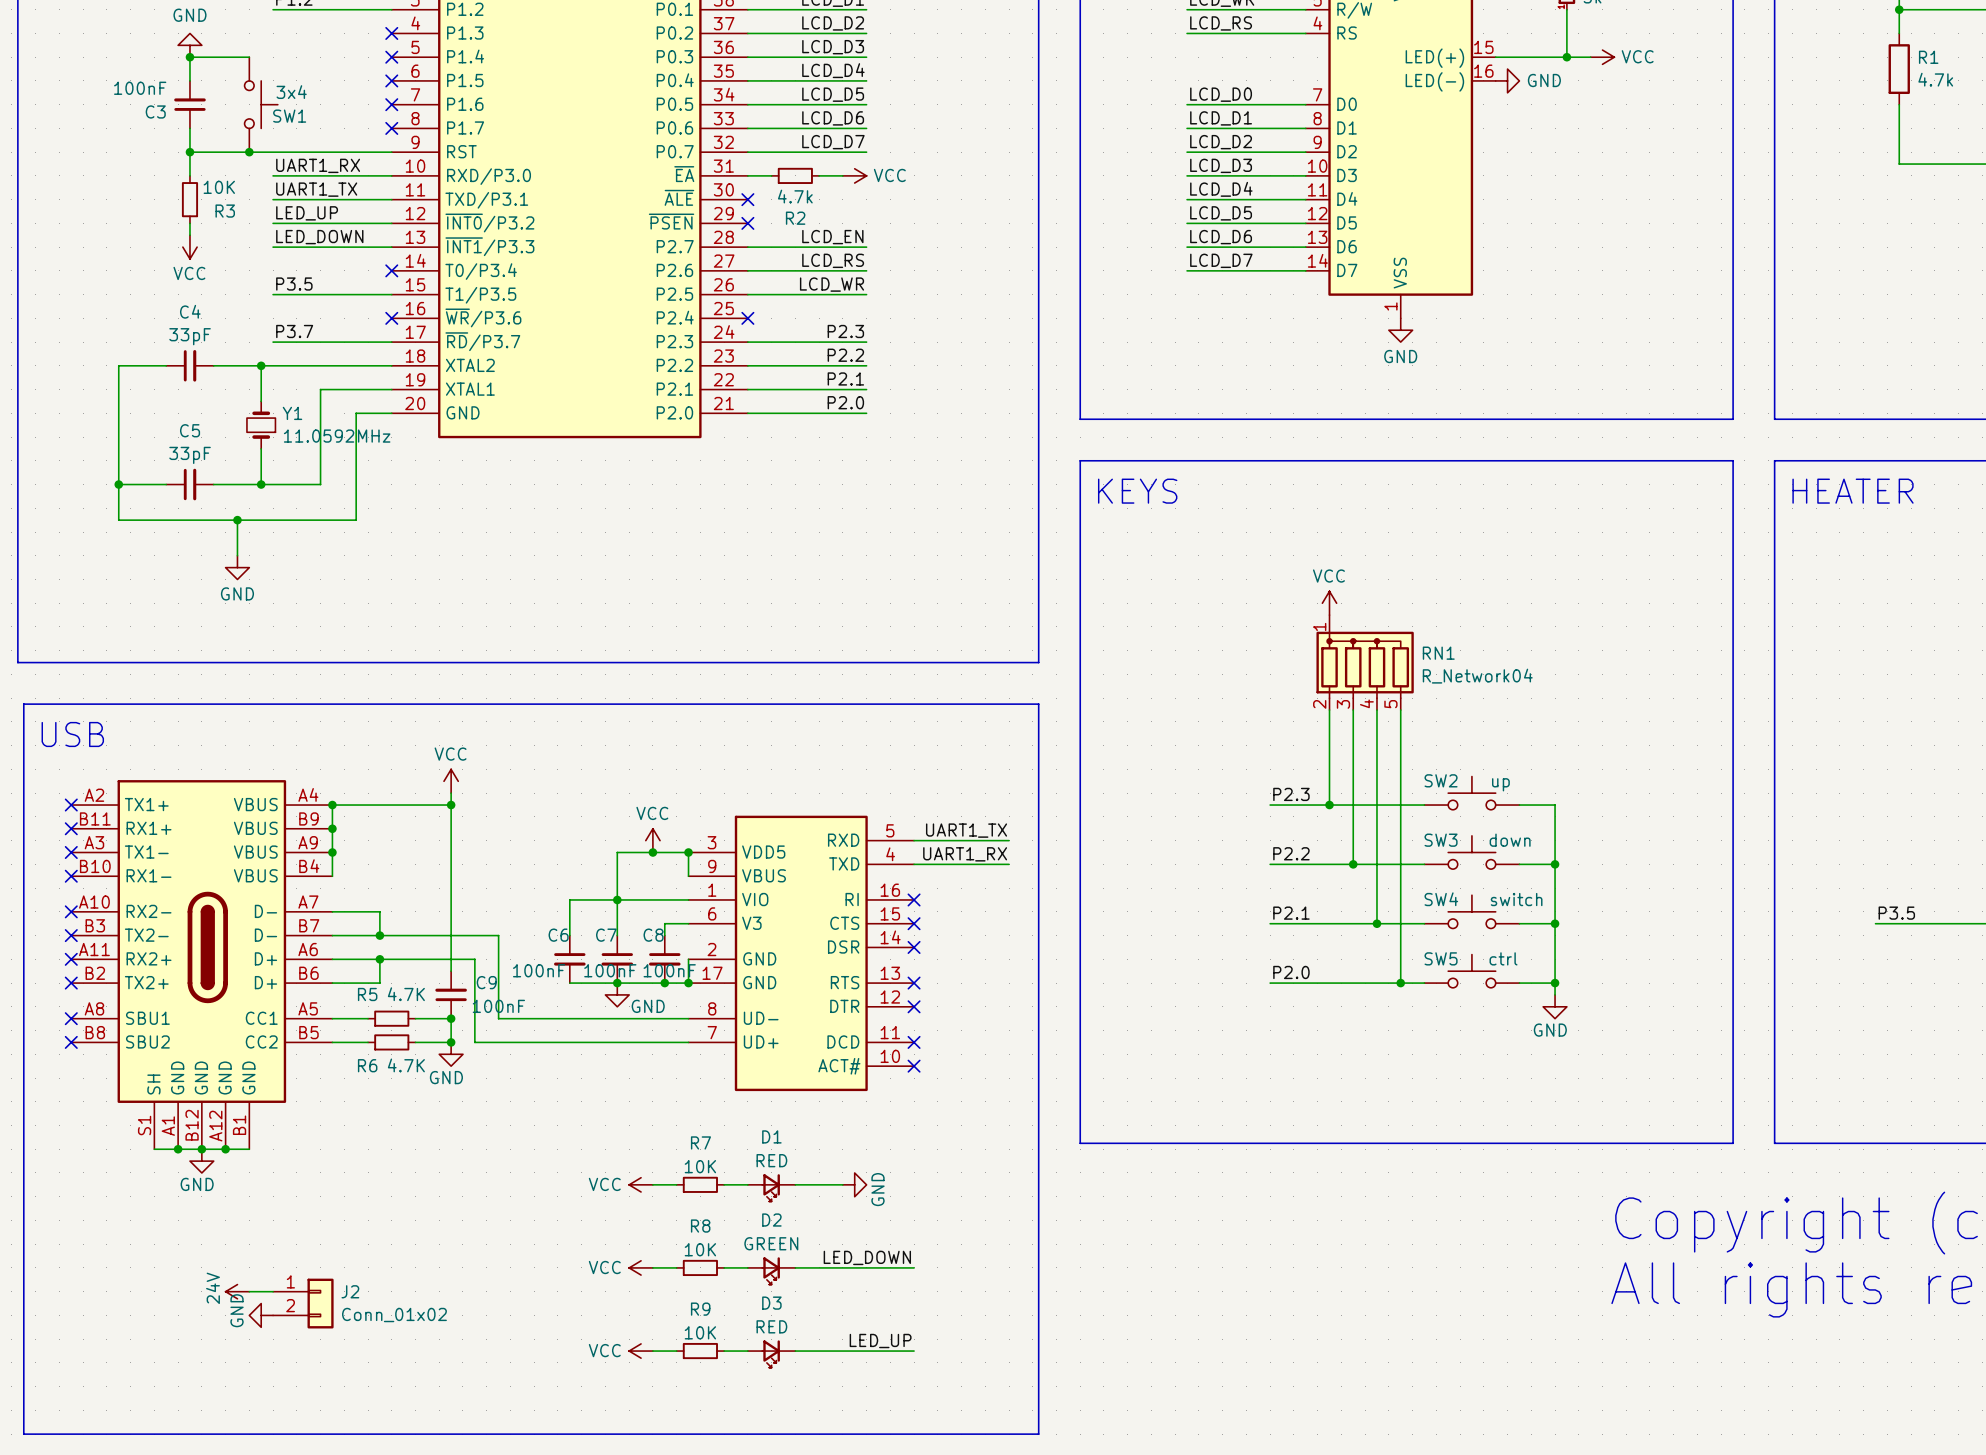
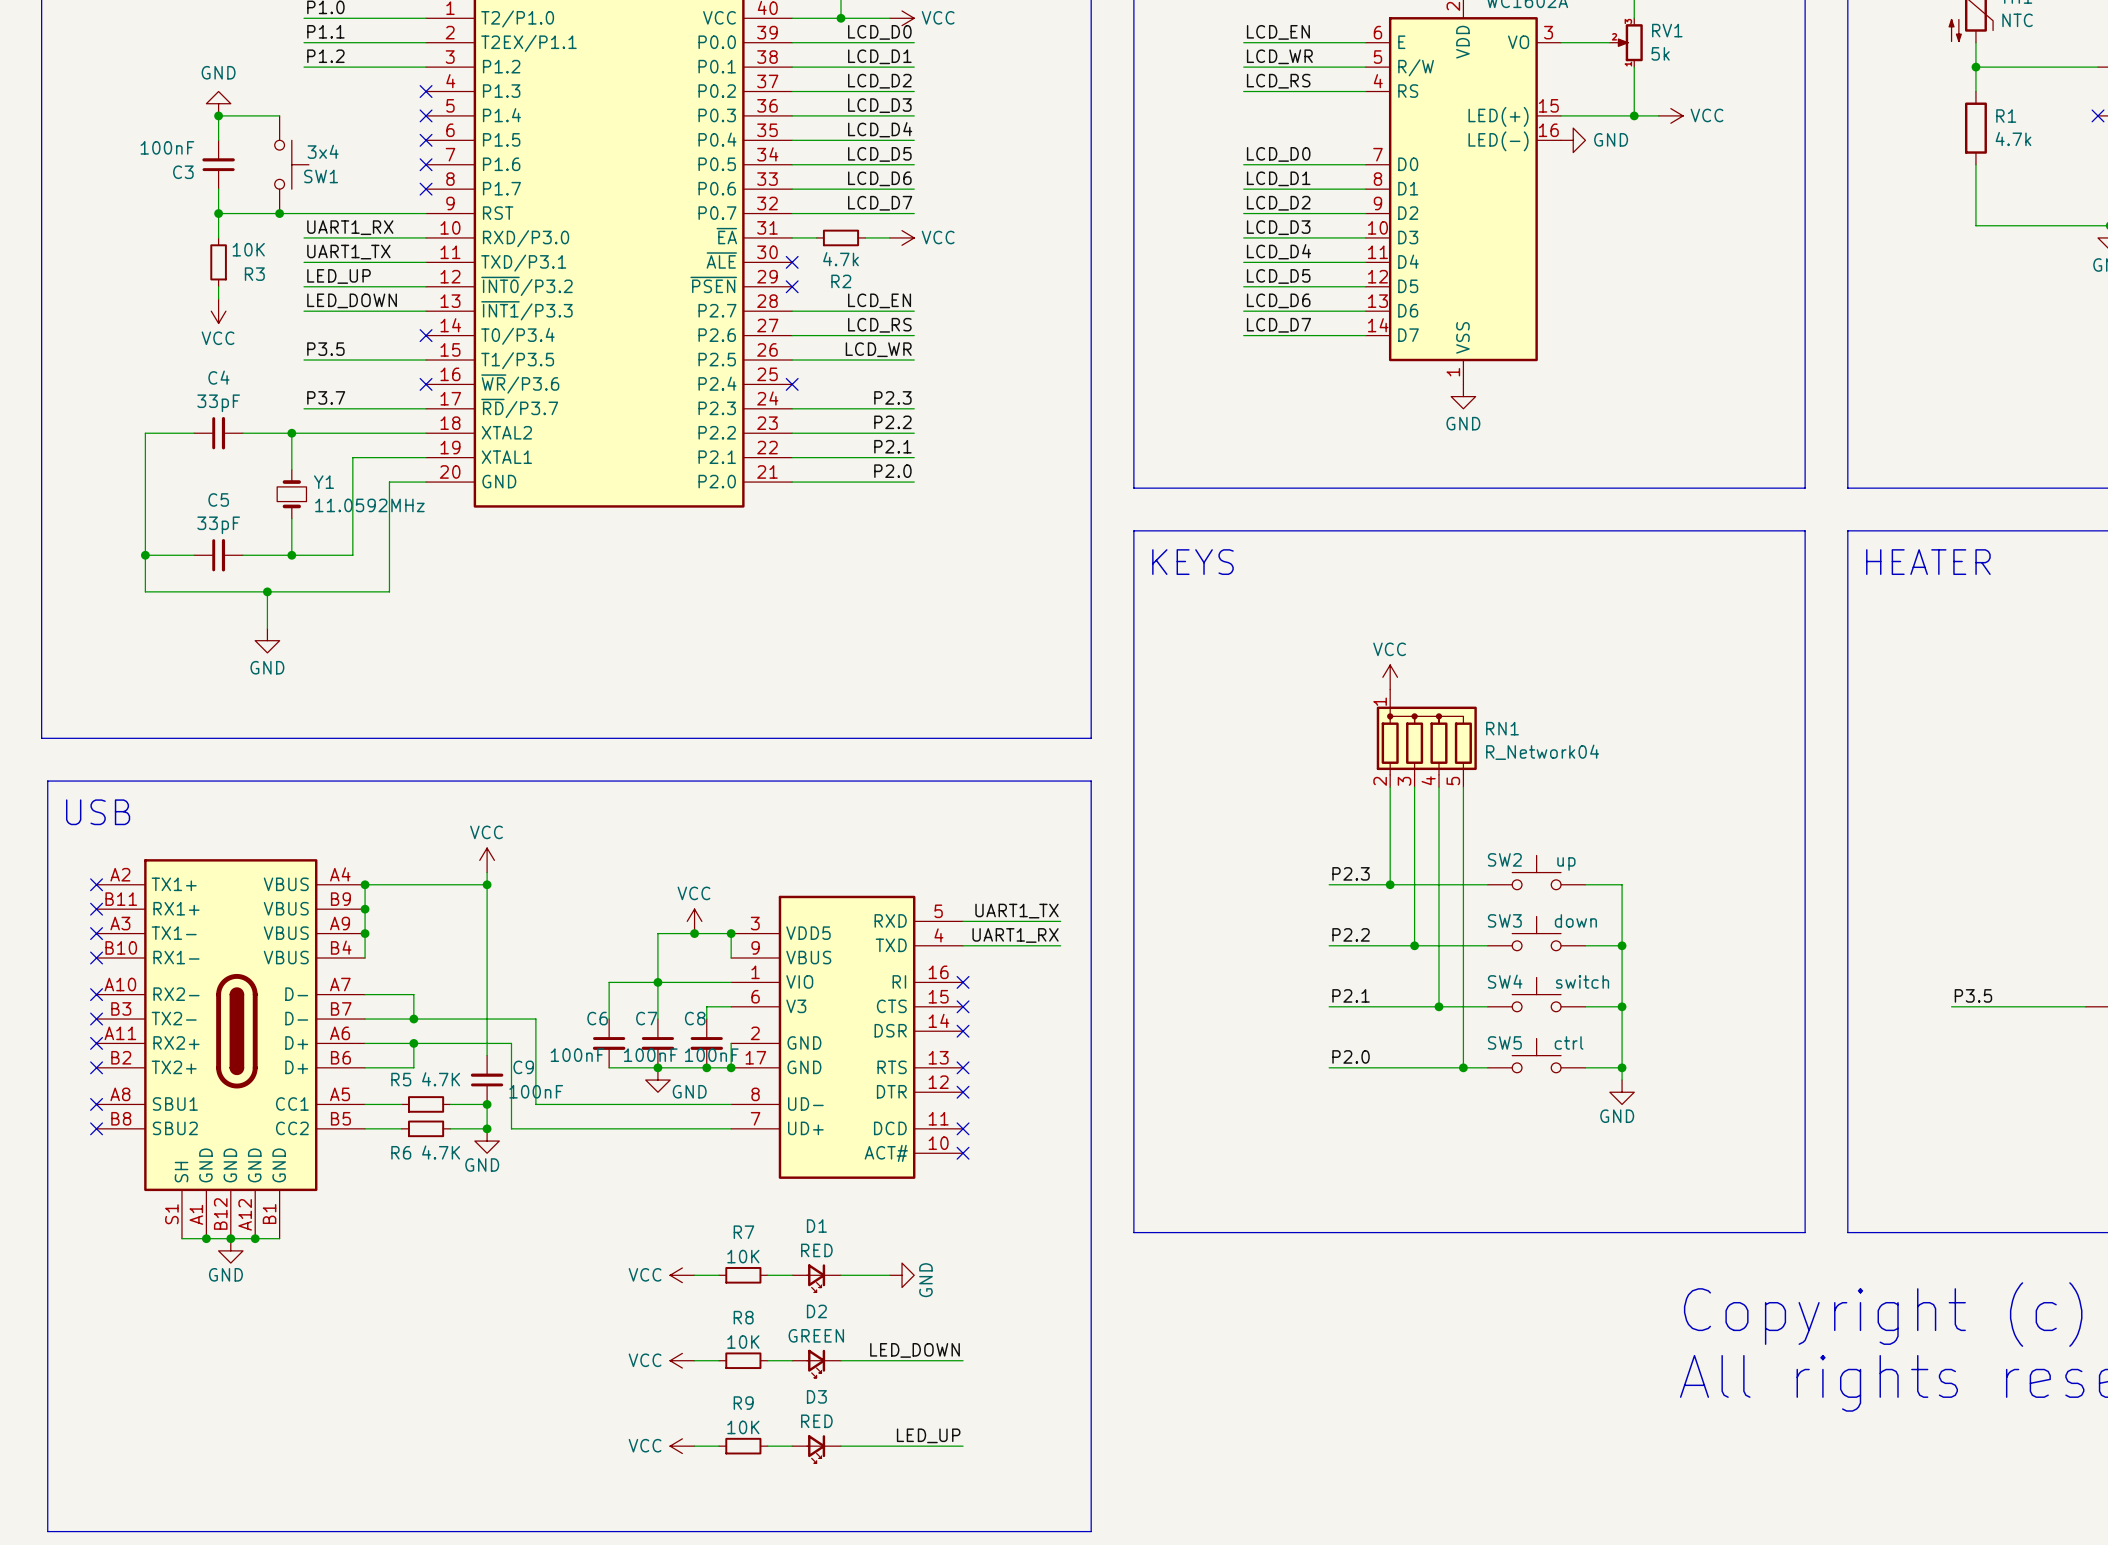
power symbol: 24V (237, 1291) -> none
wire: (249, 1291) (273, 1291) -> none
J2: Conn_01x02 (303, 1303) -> none
power symbol: GND (261, 1315) -> none

